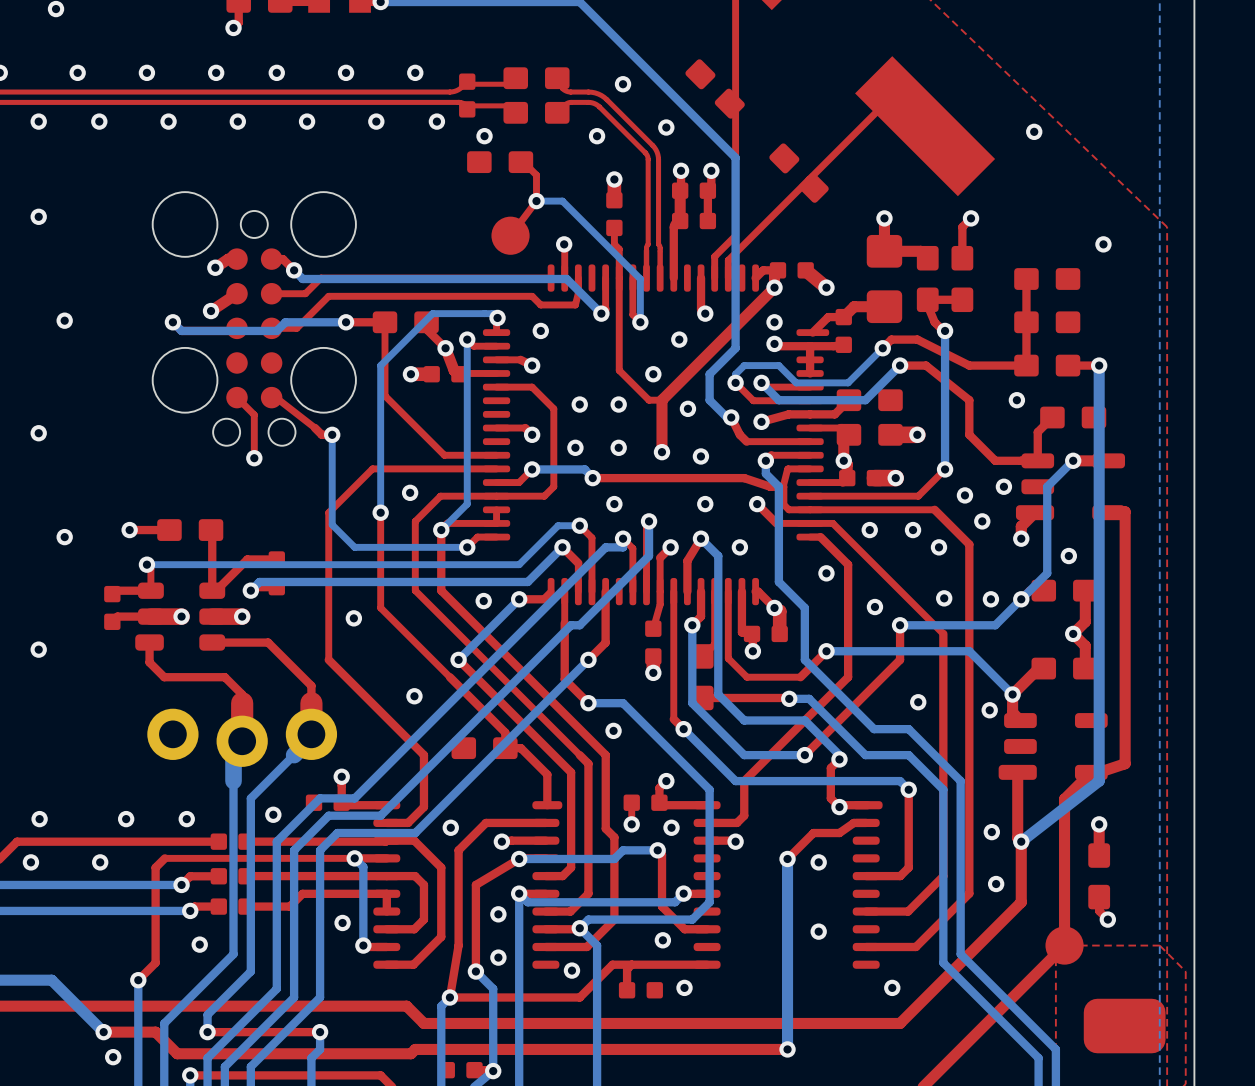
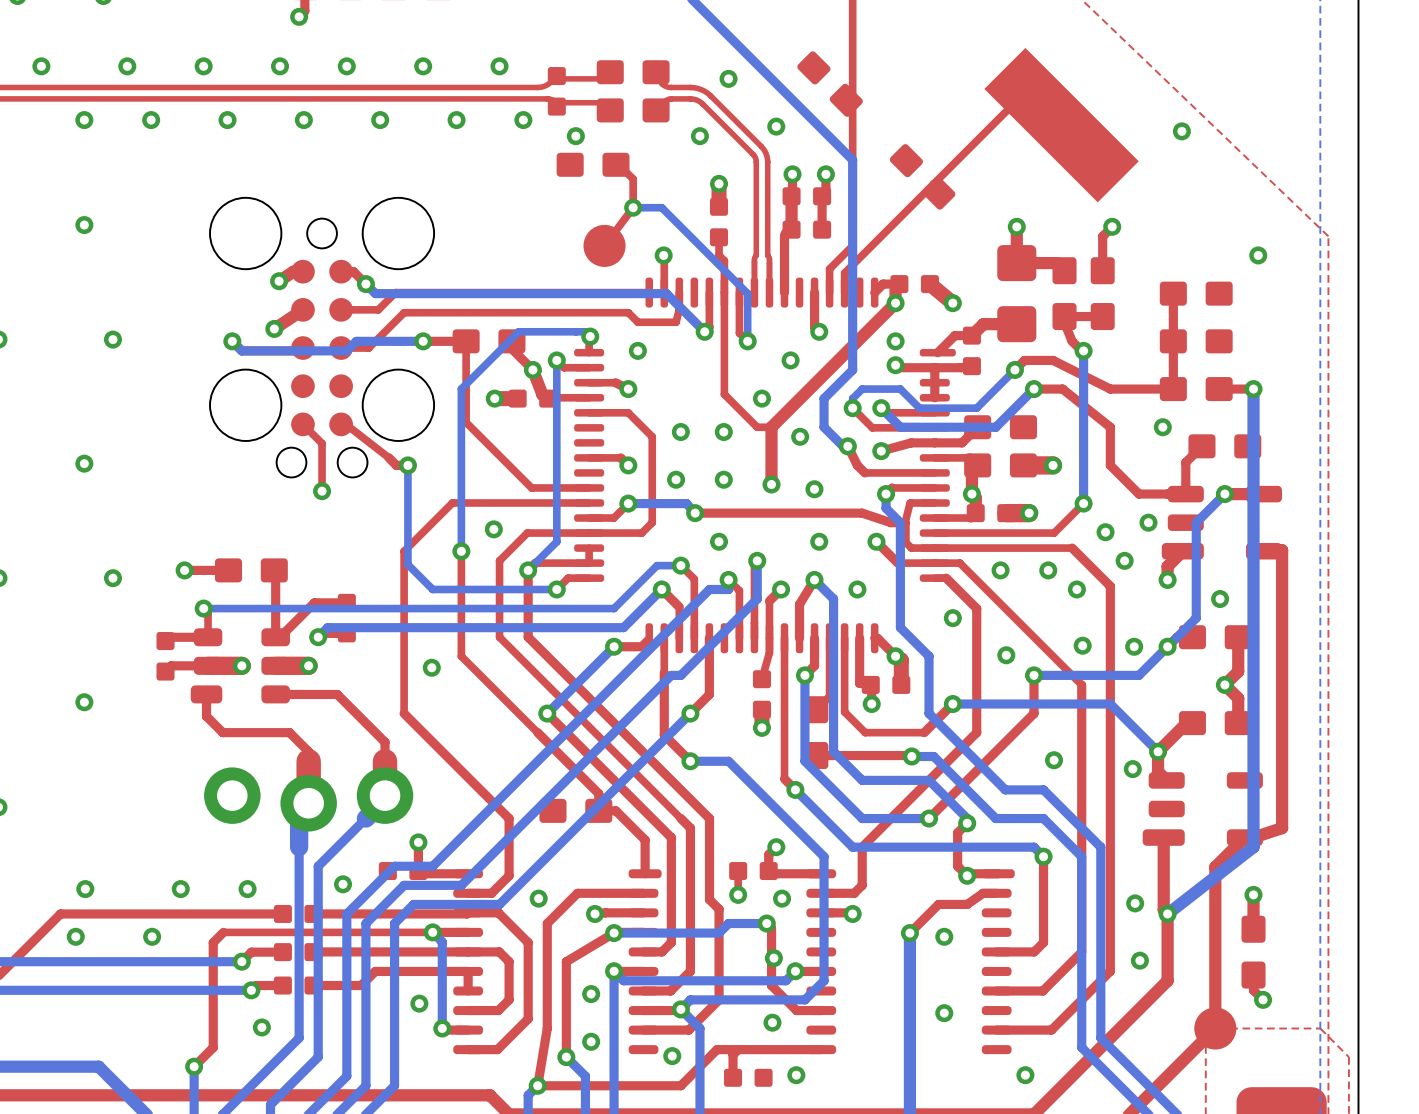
via: (483, 601) -> none
via: (414, 696) -> none
via: (613, 730) -> none
via: none -> (773, 958)

